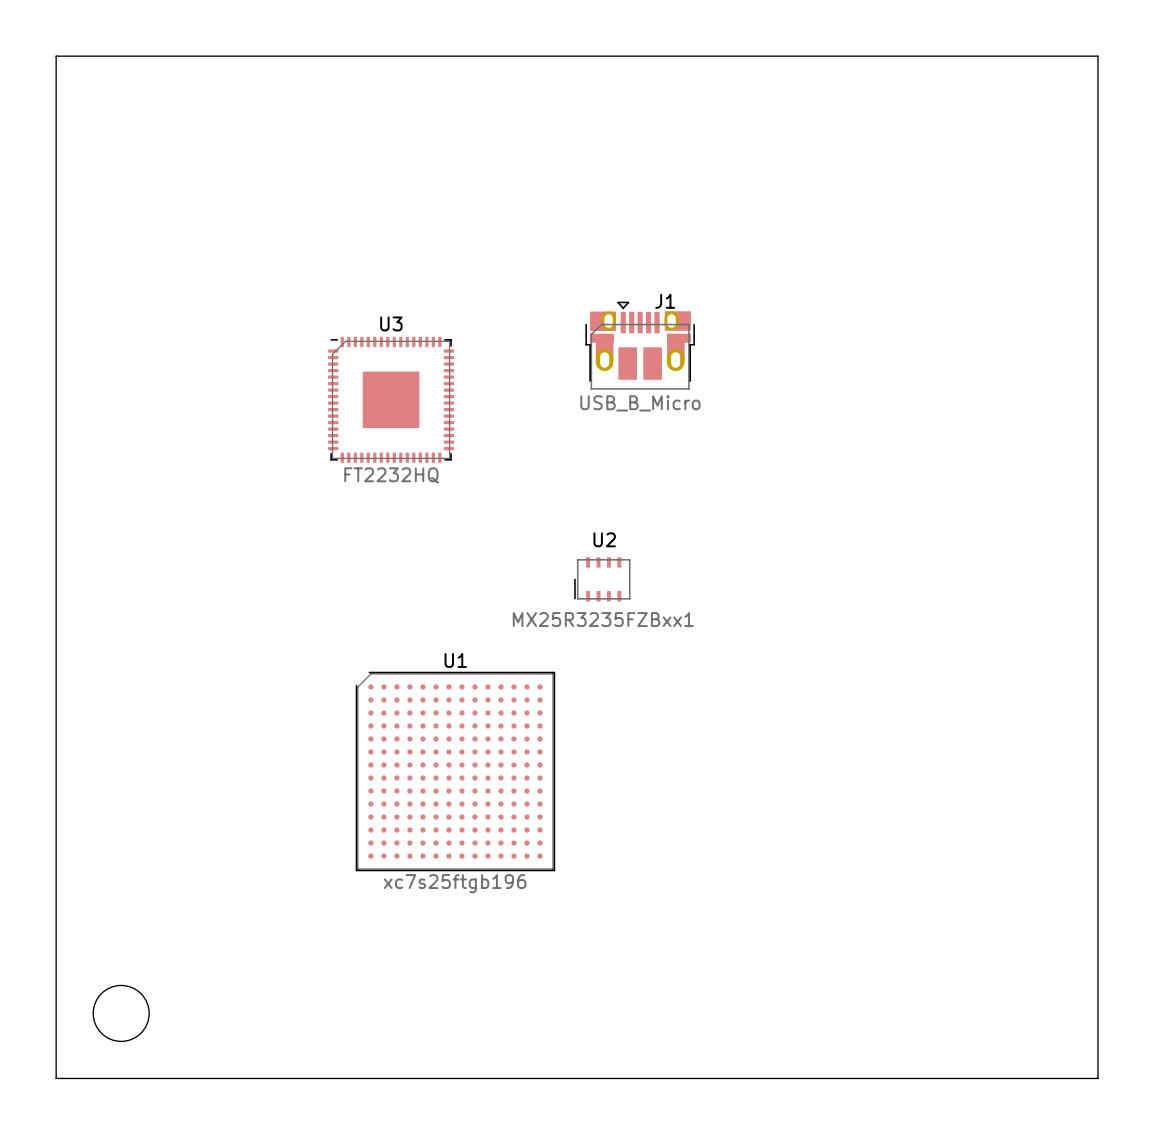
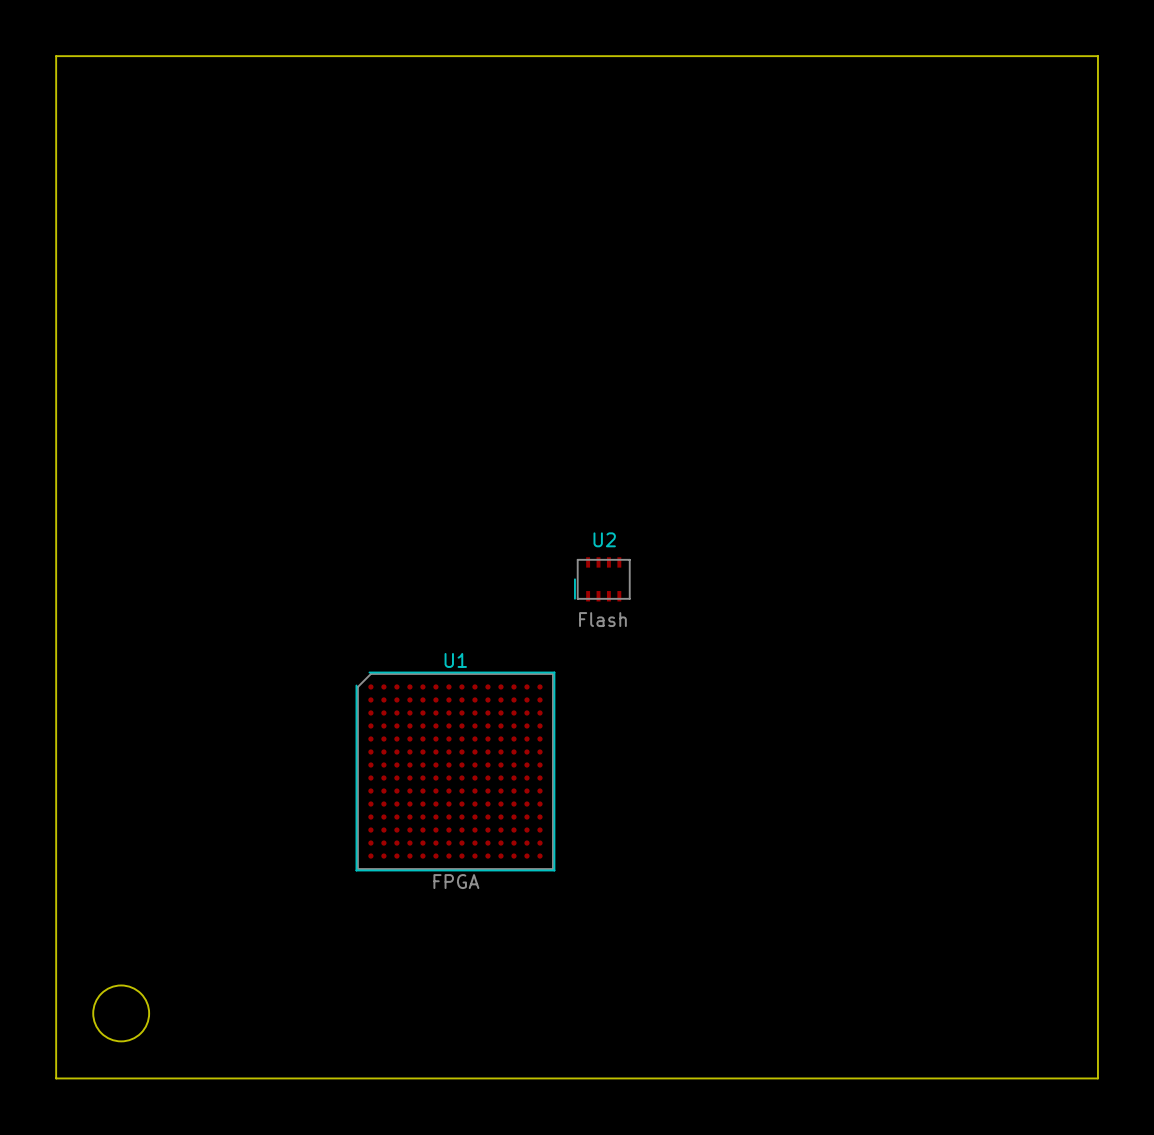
J1: USB_B_Micro (640, 345) -> none
U3: FT2232HQ (391, 399) -> none
U2 value: MX25R3235FZBxx1 (603, 619) -> Flash (602, 619)
U1 value: xc7s25ftgb196 (455, 883) -> FPGA (456, 881)

